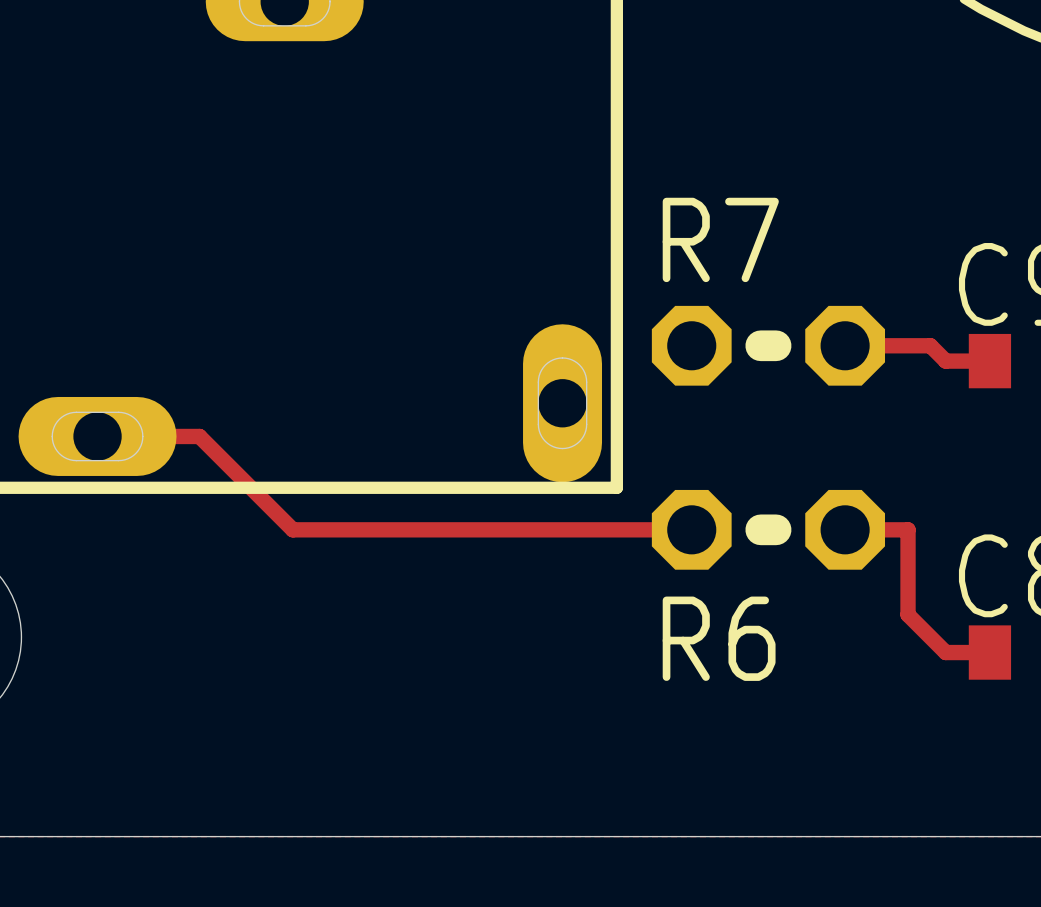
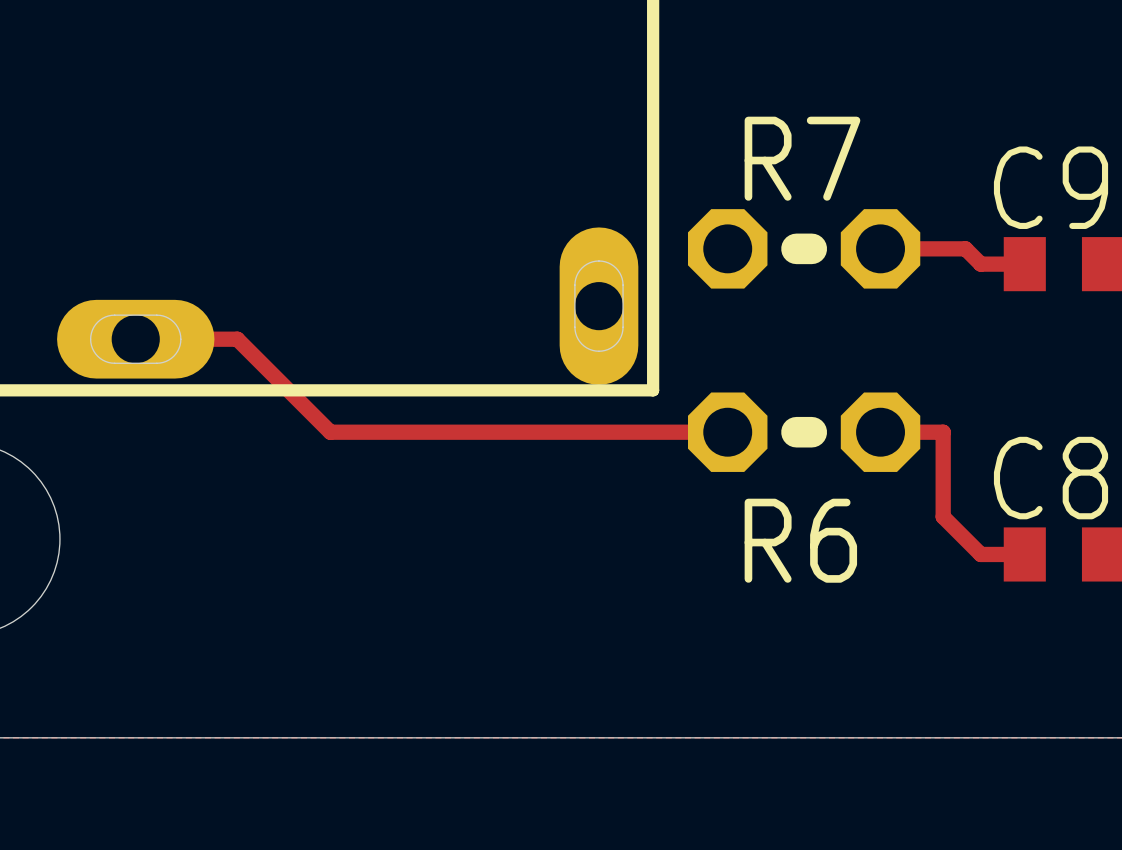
R7 name position: R7 (720, 239) -> R7 (802, 158)
R6 name position: R6 (719, 638) -> R6 (800, 540)

